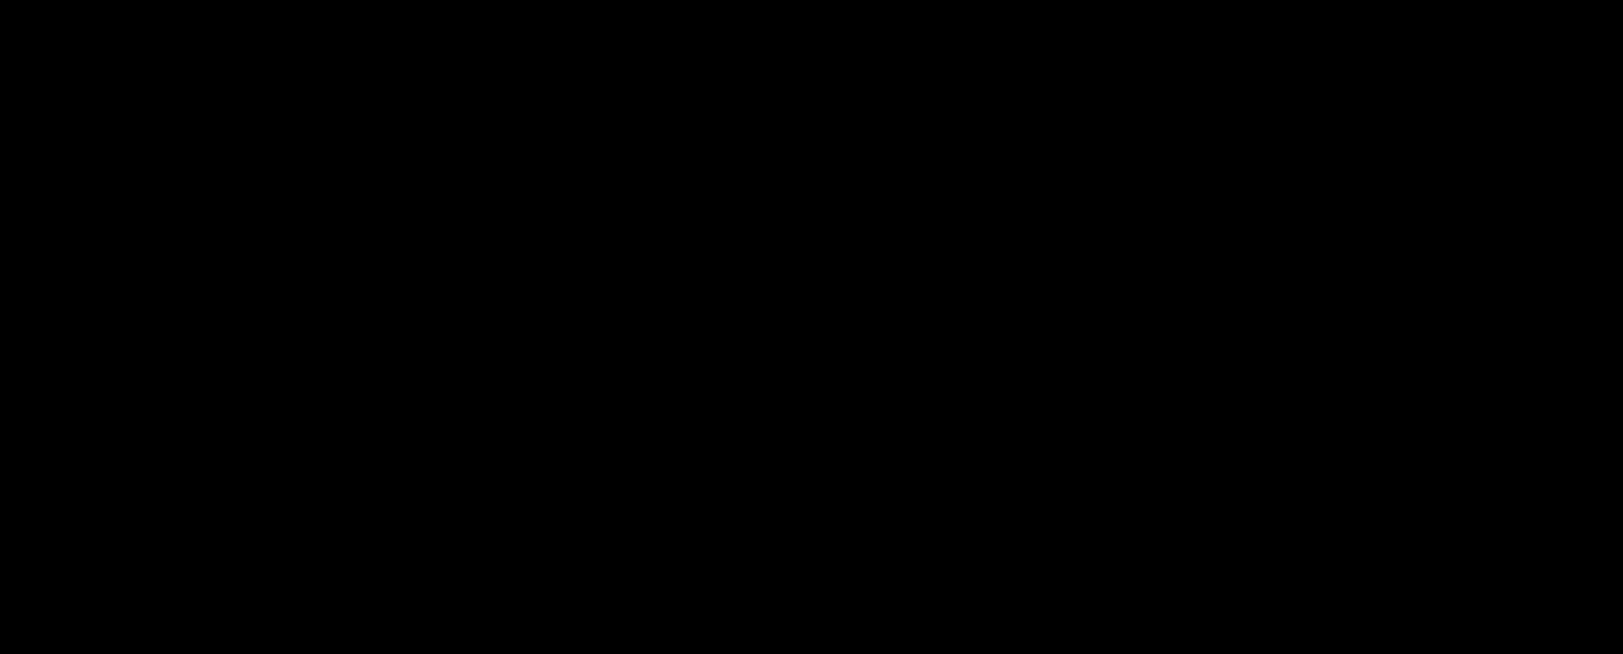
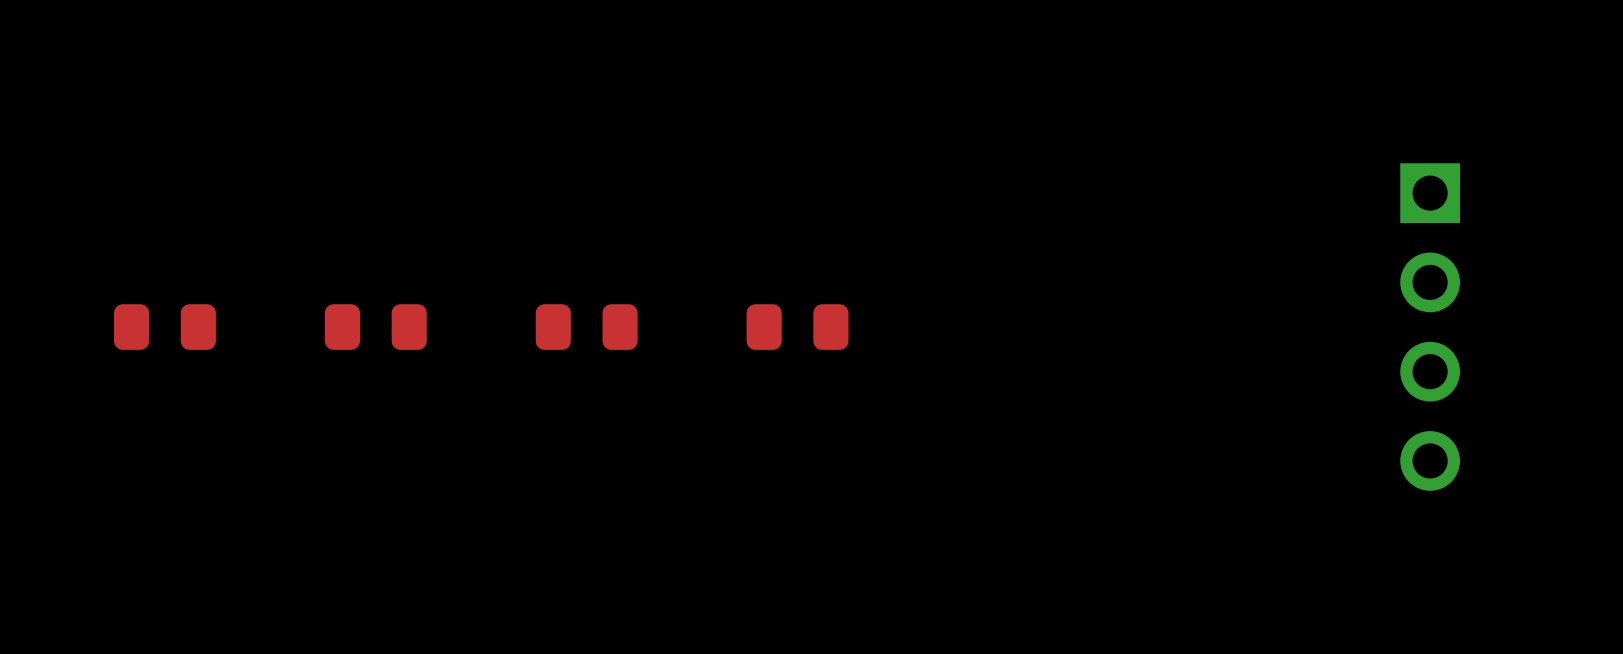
part: none -> (164, 327)
part: none -> (375, 327)
part: none -> (586, 327)
part: none -> (797, 327)
part: none -> (1430, 327)

